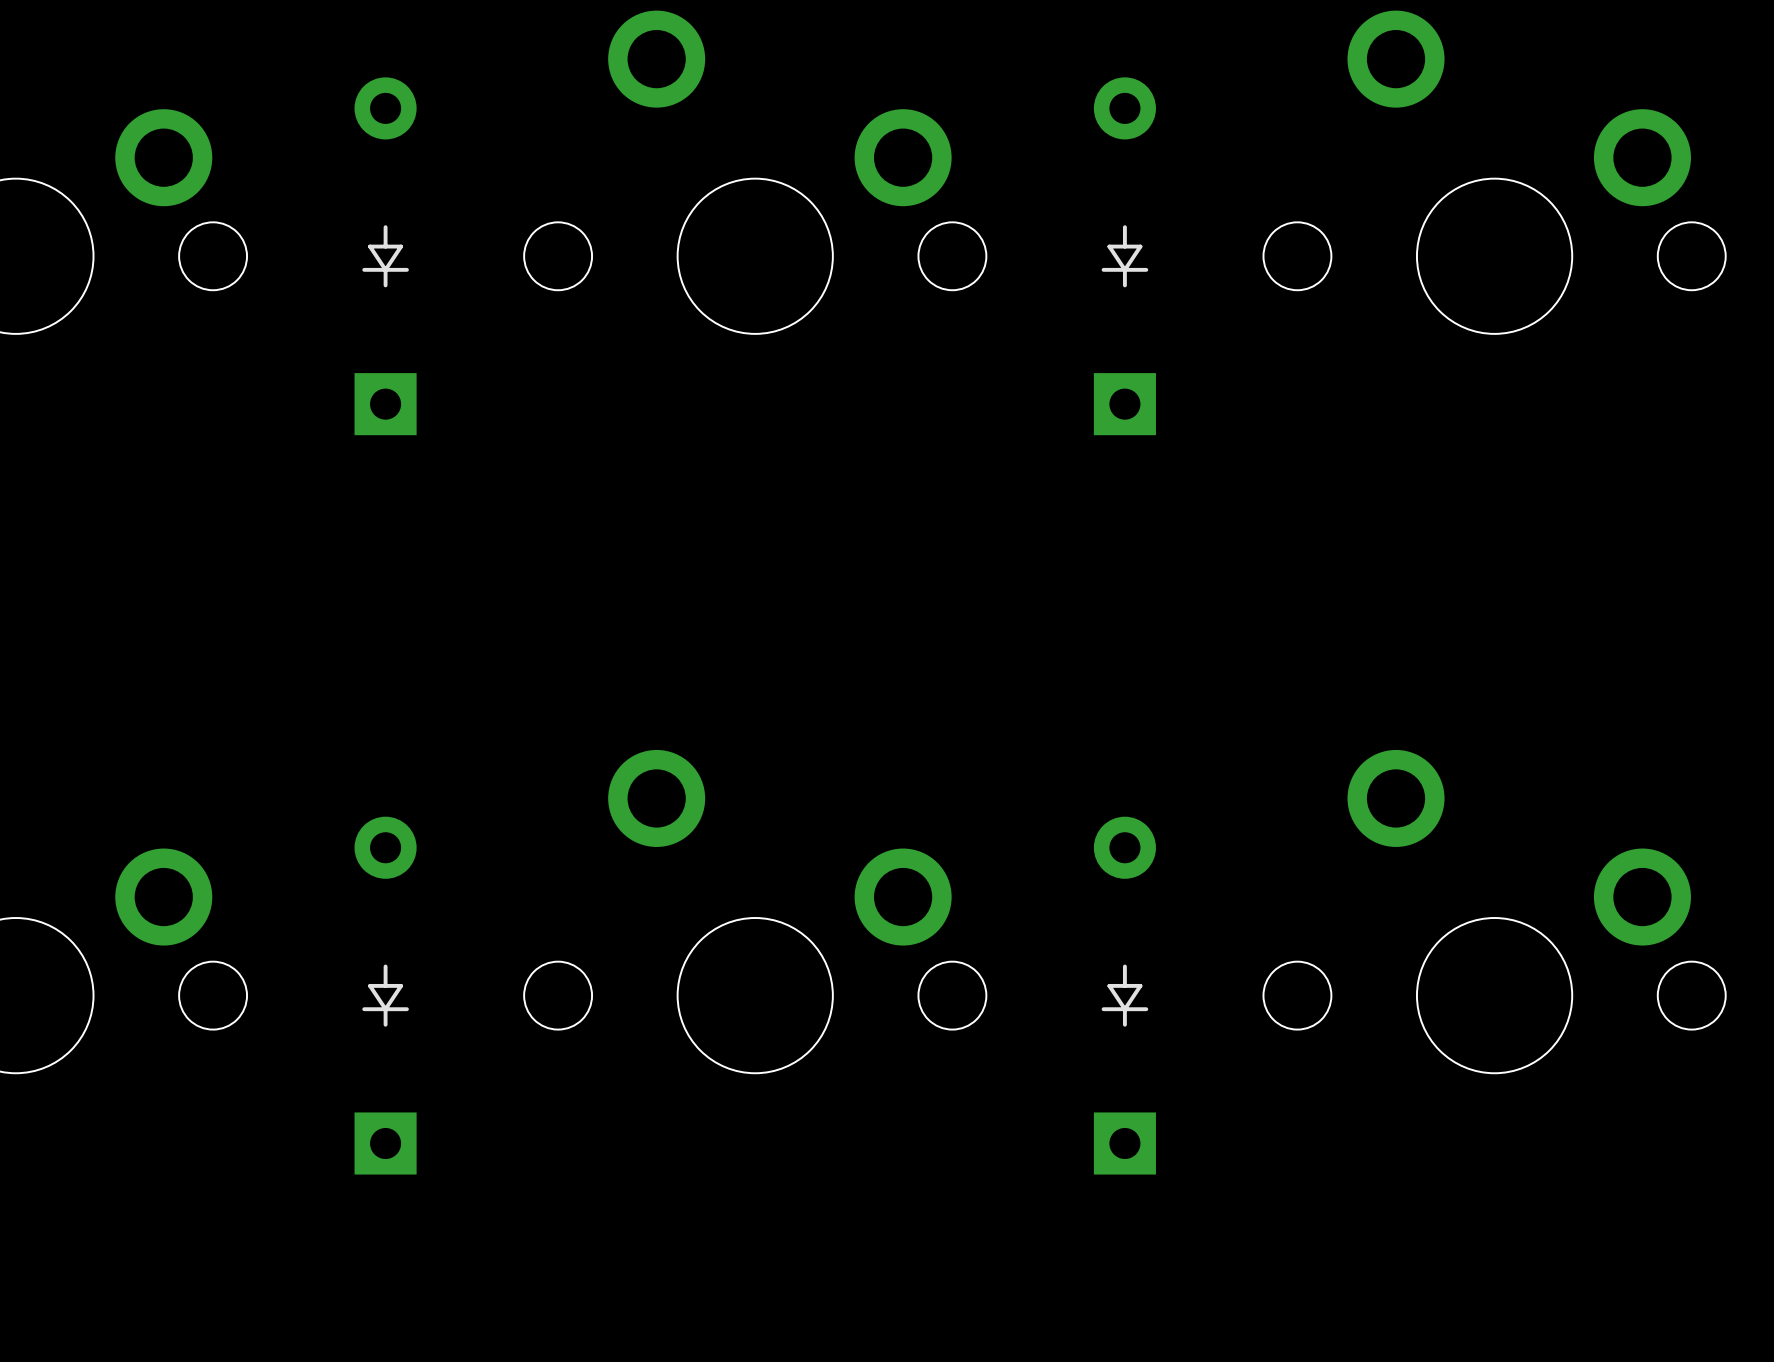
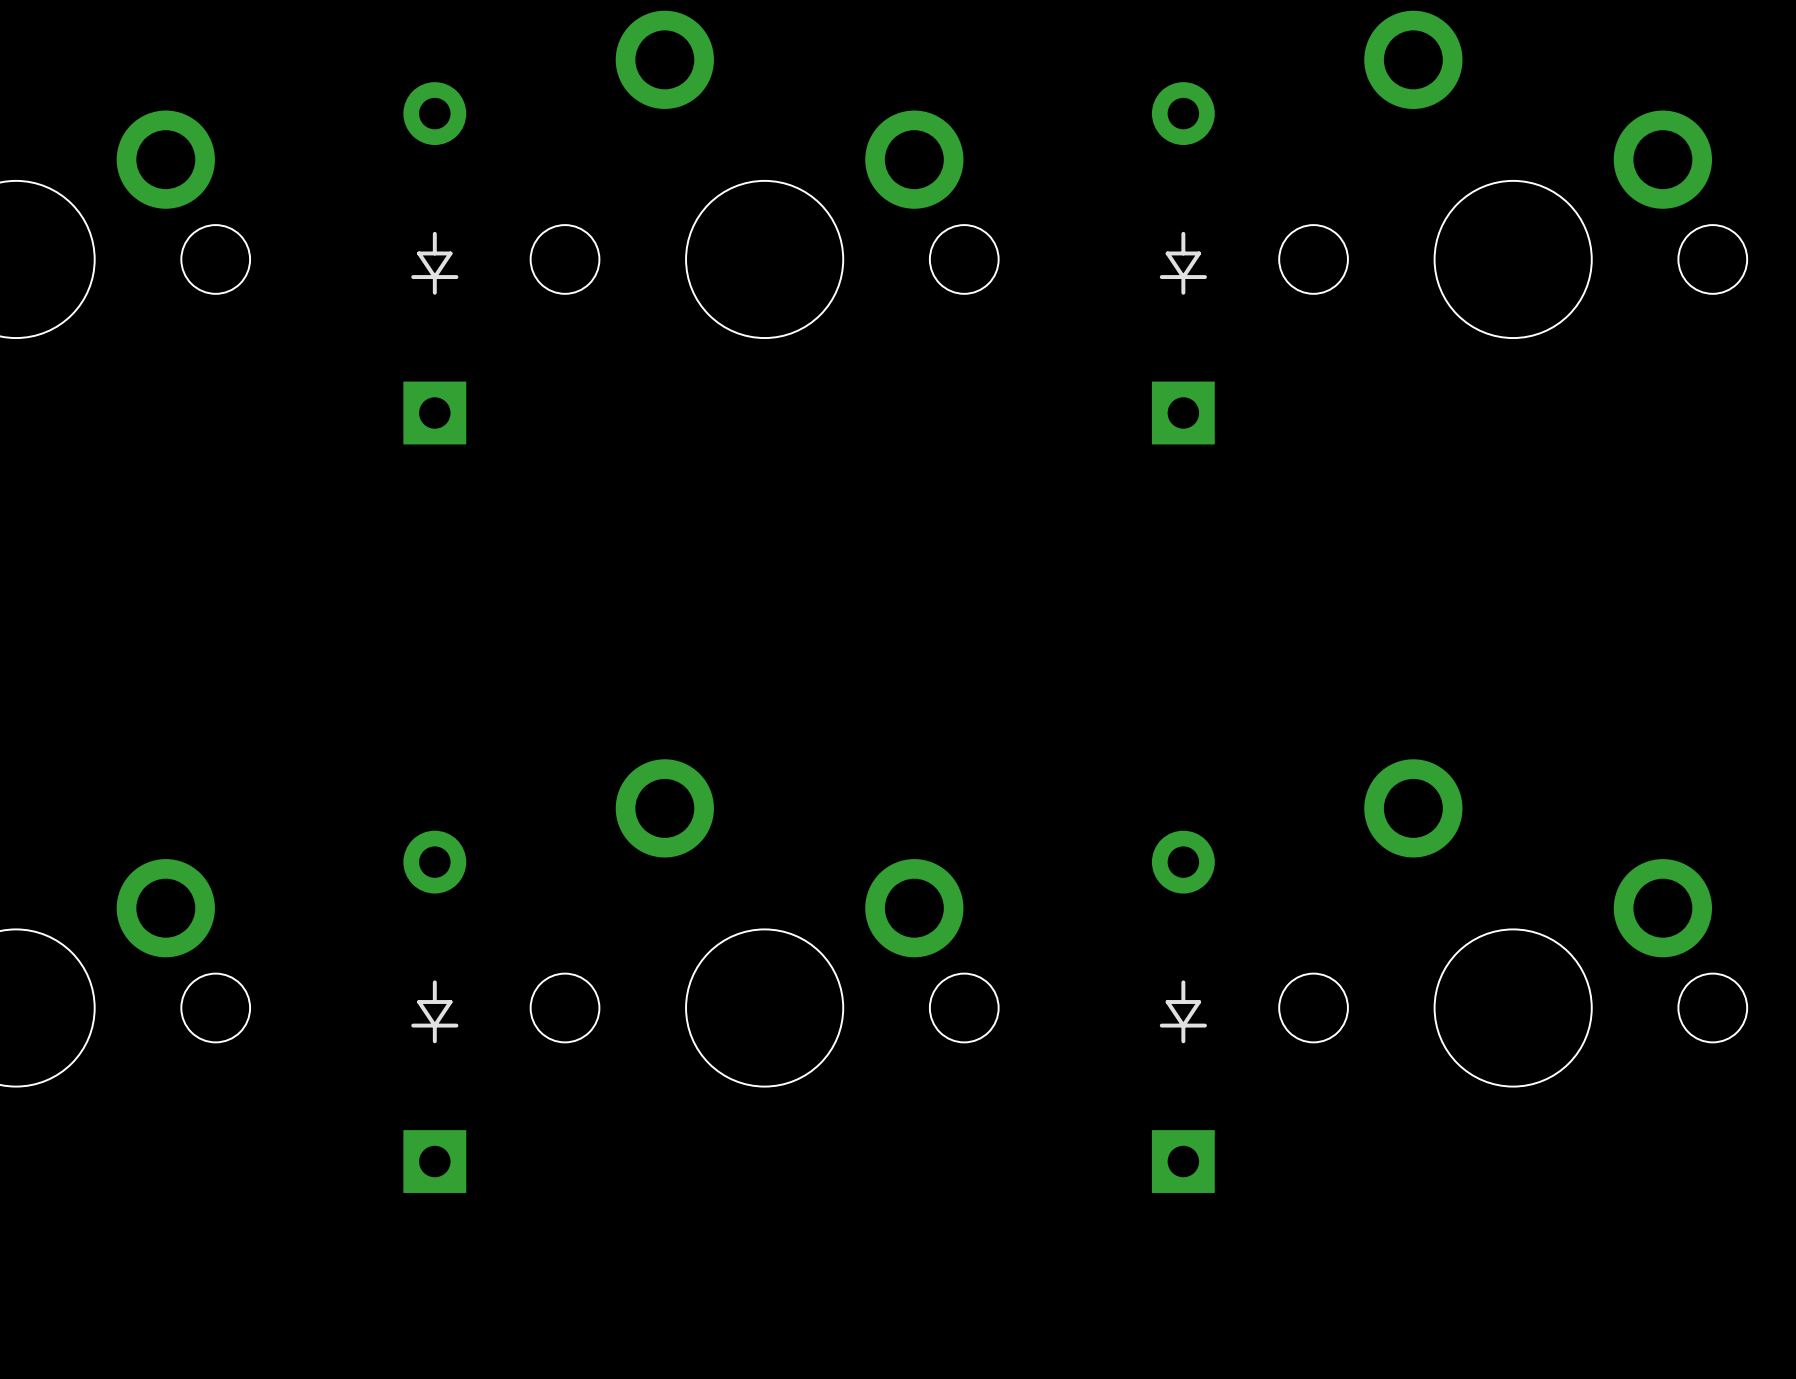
part position: (385, 256) -> (434, 263)
part position: (1124, 256) -> (1183, 263)
part position: (385, 995) -> (434, 1011)
part position: (1124, 995) -> (1183, 1011)

